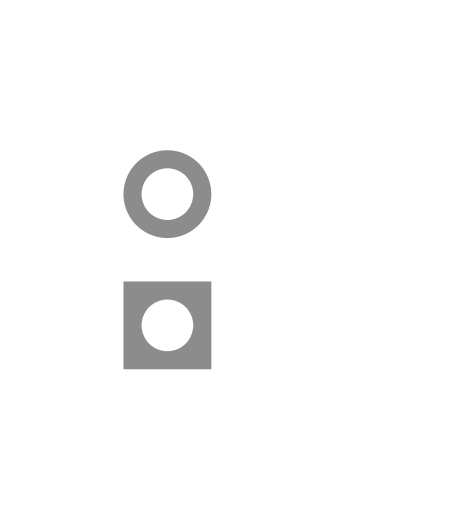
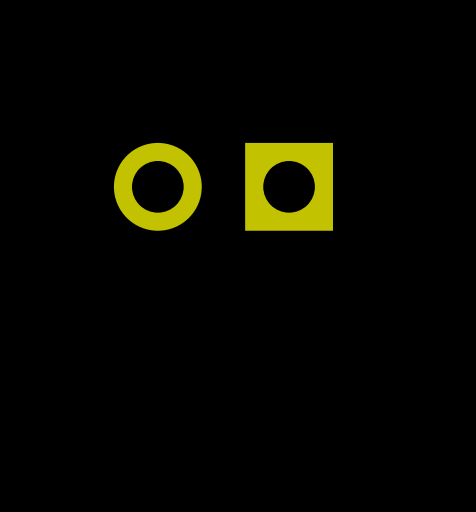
part rotation: 0° (167, 259) -> 90° counterclockwise (223, 186)

